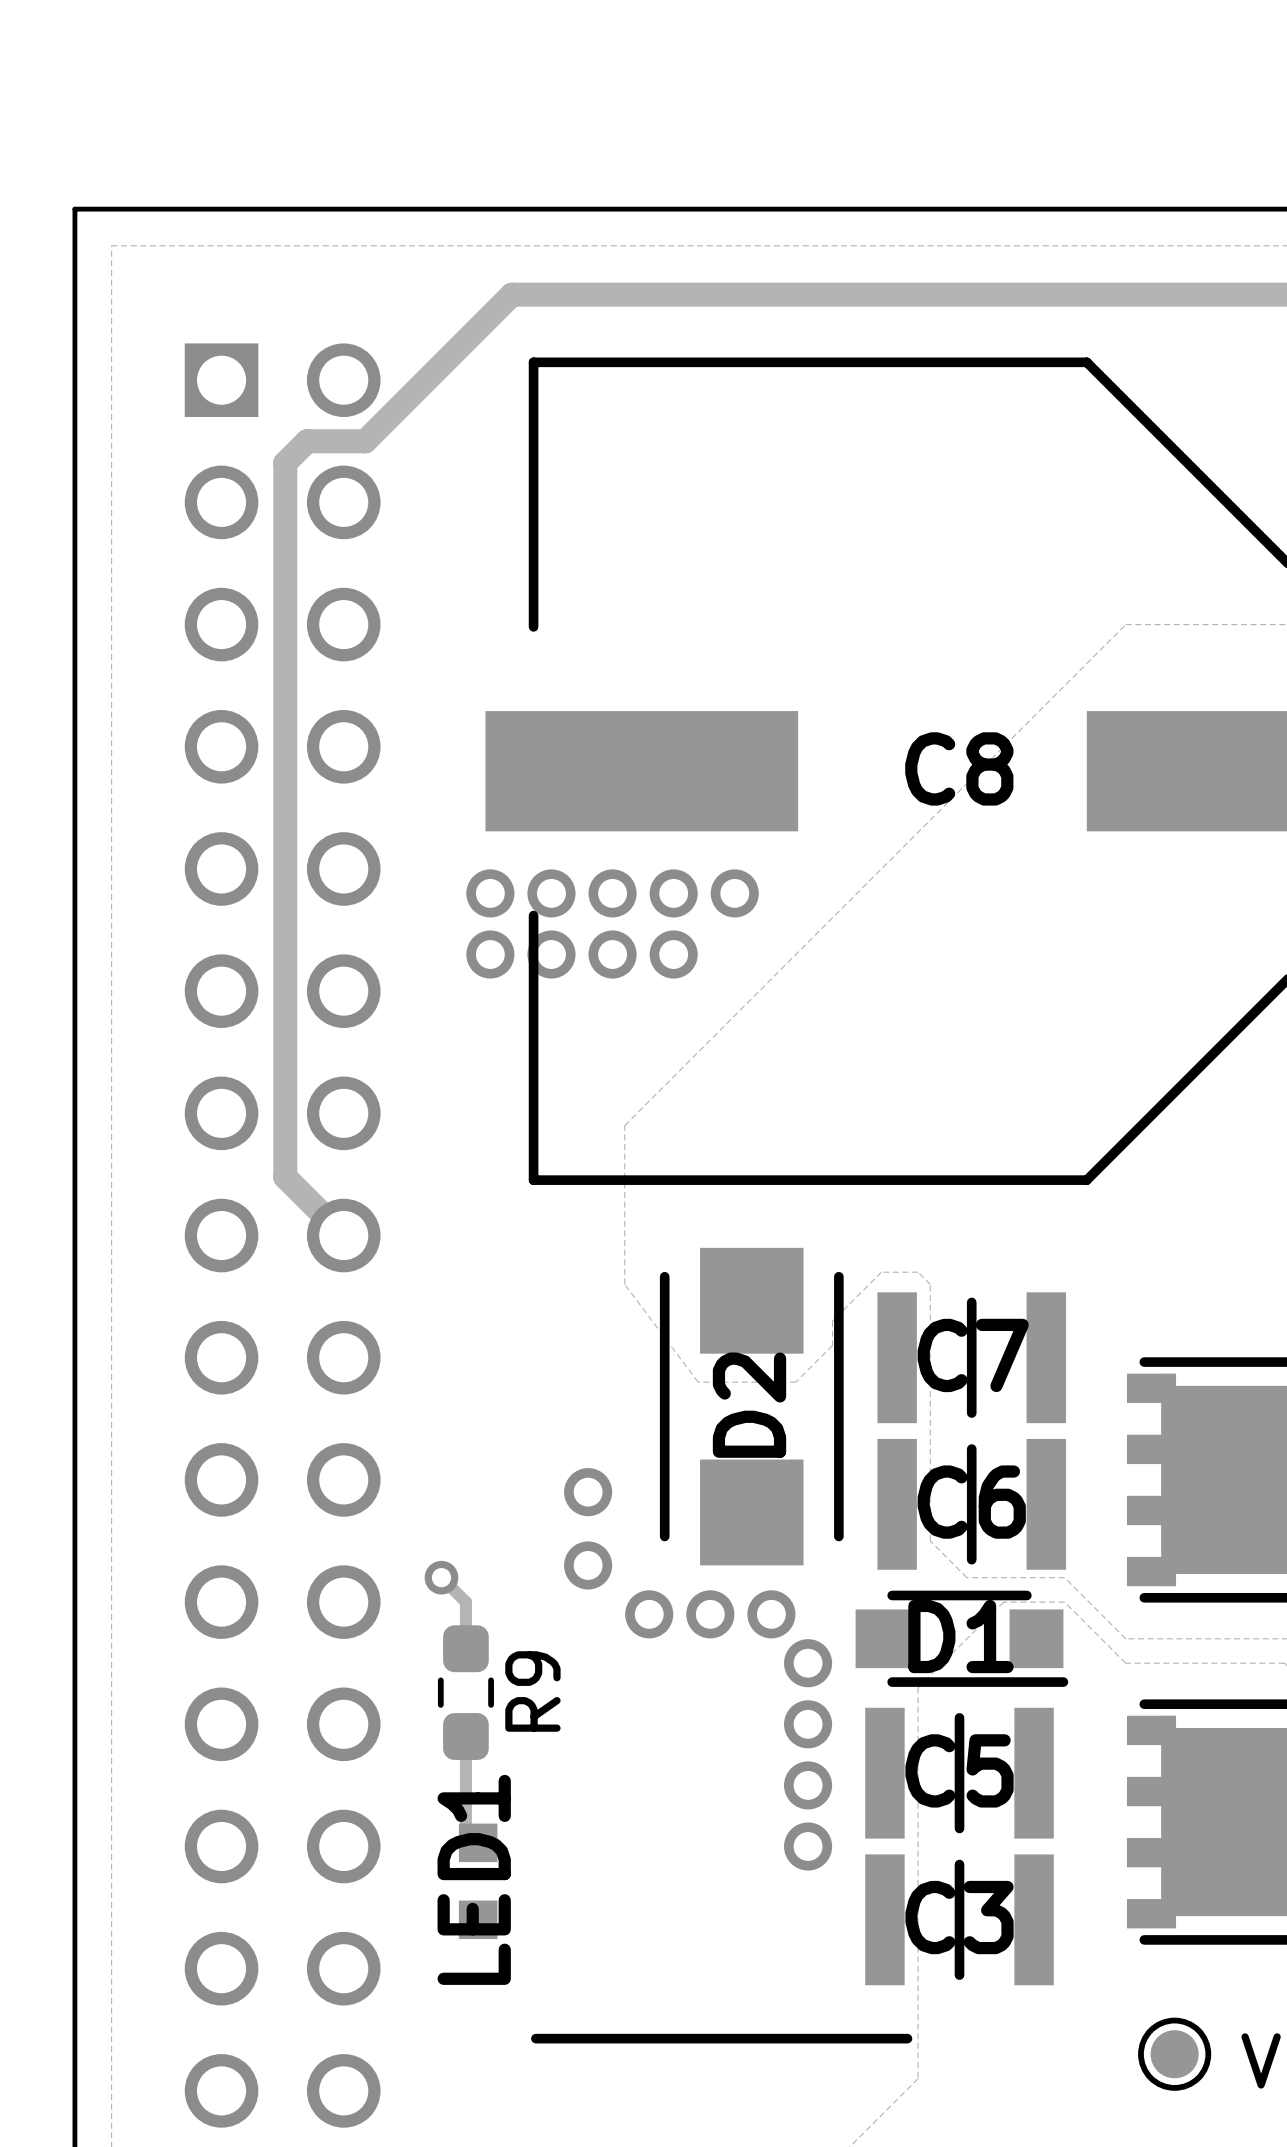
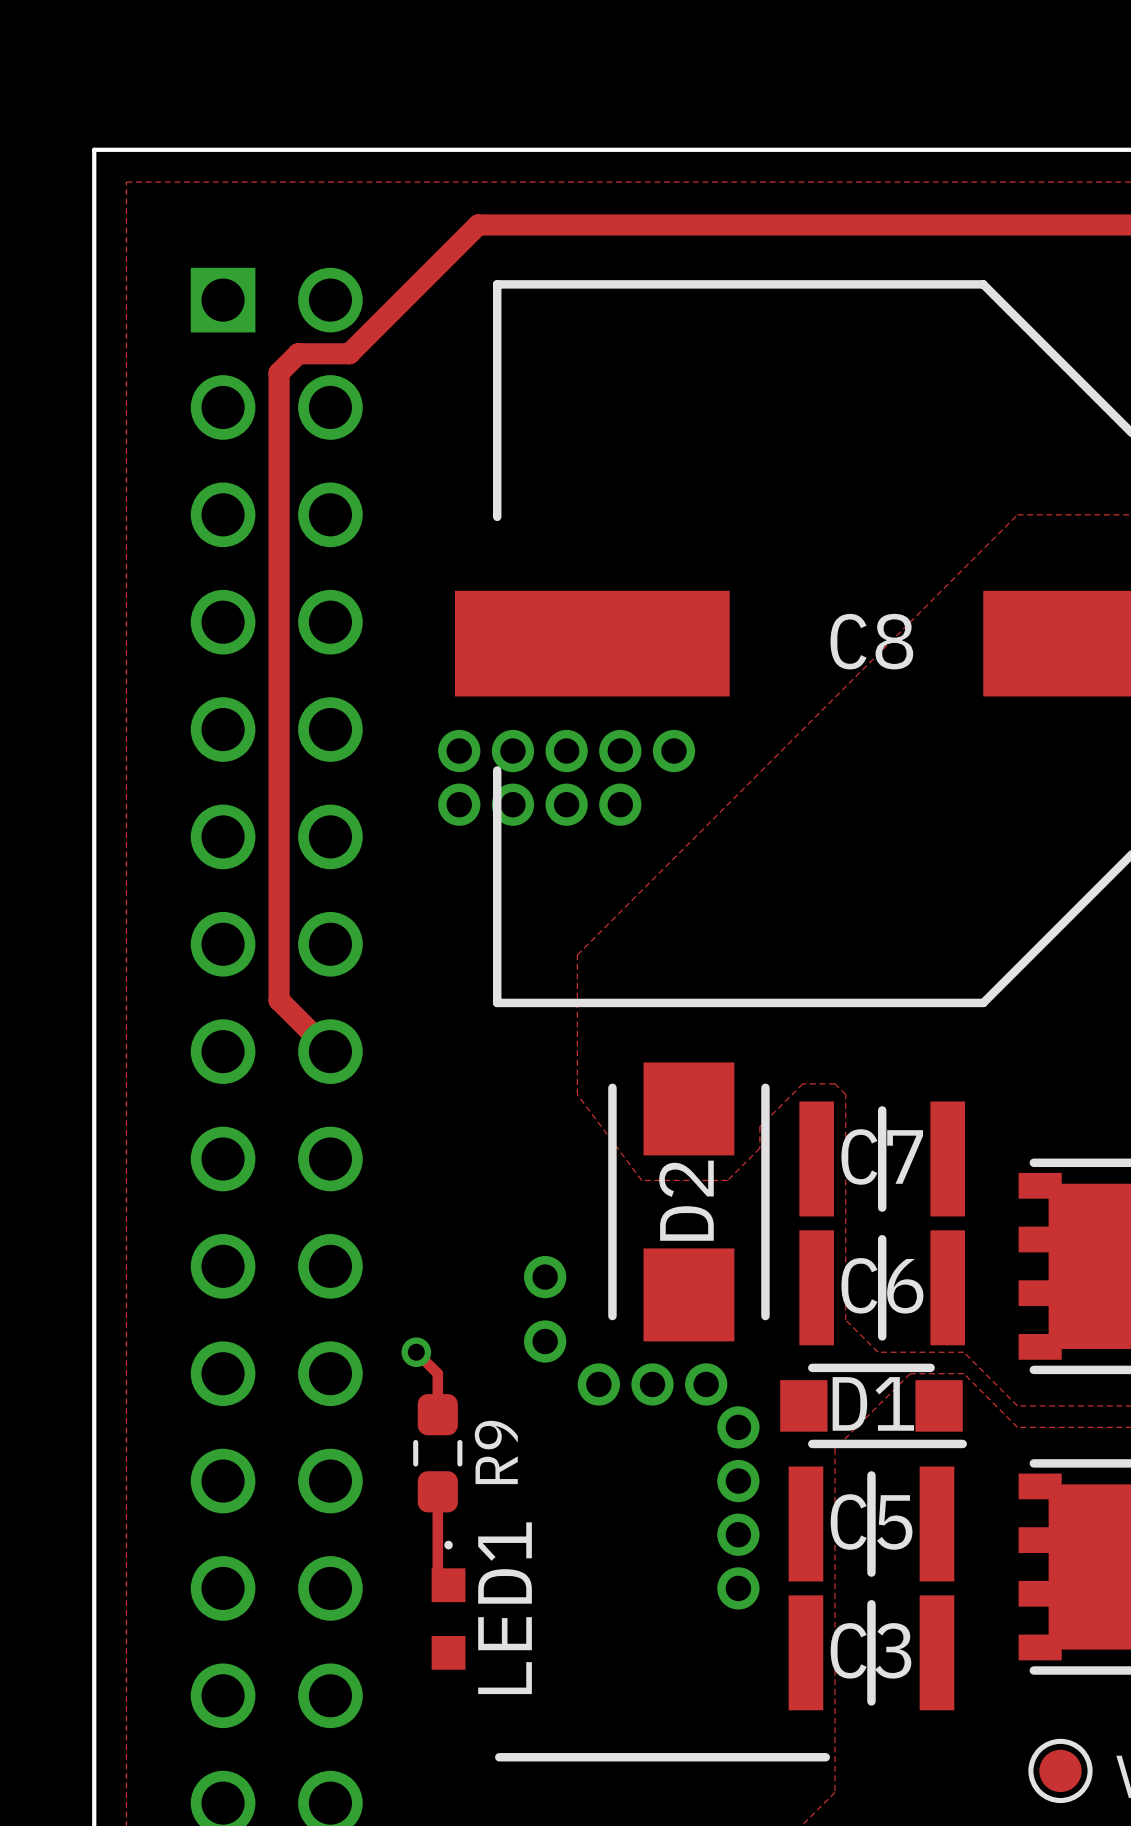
LED1 name position: LED1 (474, 1879) -> LED1 (505, 1608)

